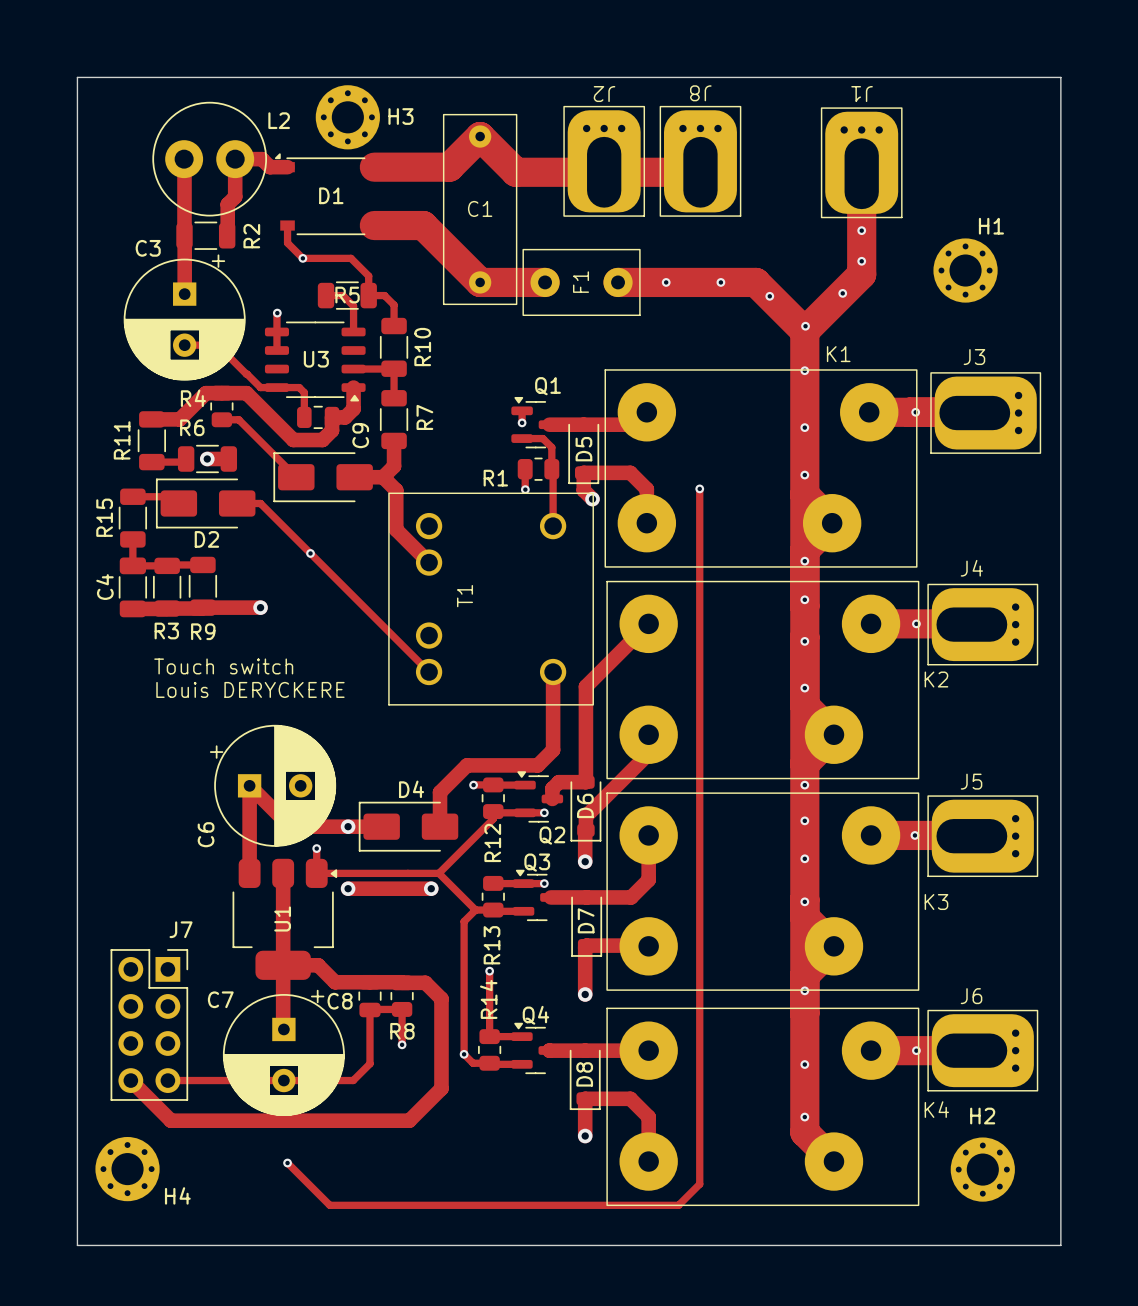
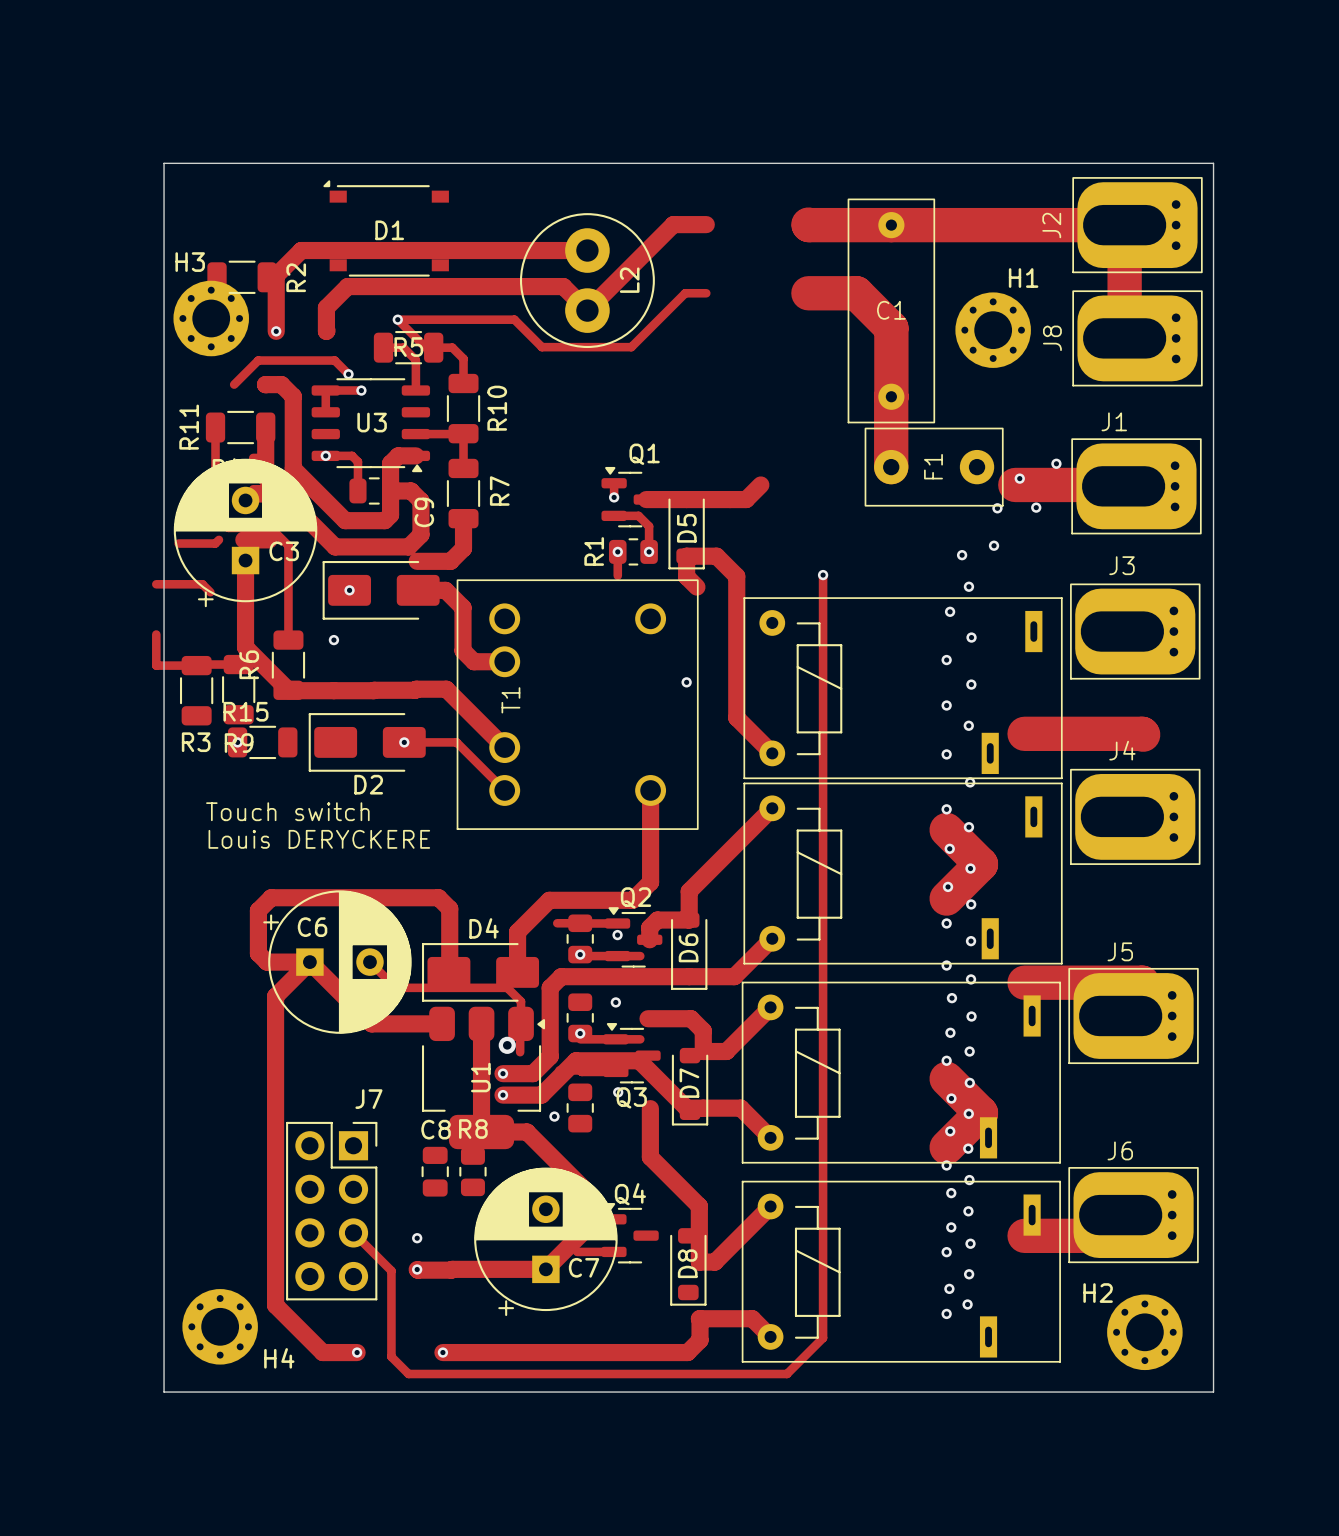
board edge: (77, 77) (1060, 77) (1060, 1245) (77, 1245) (77, 77) -> (164, 163) (164, 1392) (1213, 1392) (1213, 163) (164, 163)
J8 name position: J8 (700, 93) -> J8 (1052, 338)
J2 name position: J2 (604, 94) -> J2 (1051, 225)
H3 name position: H3 (400, 116) -> H3 (190, 262)
H3 position: (347, 117) -> (211, 318)
L2 name position: L2 (279, 120) -> L2 (629, 280)
track: (184, 159) (184, 235) -> none
L2 rotation: 0° (209, 159) -> 90° clockwise (587, 280)
L2 position: (209, 159) -> (587, 280)
J2 rotation: 0° (604, 161) -> 90° clockwise (1137, 225)
J2 position: (604, 161) -> (1137, 225)
J8 rotation: 0° (700, 161) -> 90° clockwise (1137, 338)
J8 position: (700, 161) -> (1137, 338)
J1 rotation: 0° (861, 162) -> 90° clockwise (1136, 486)
J1 position: (861, 162) -> (1136, 486)
track: (287, 167) (270, 167) (262, 159) (235, 159) (235, 196) (227, 204) (227, 235) -> none
track: (374, 167) (449, 167) (480, 136) (515, 172) (700, 172) -> none
track: (861, 173) (861, 274) (804, 331) -> none
track: none -> (706, 224) (673, 224) (587, 310) (563, 286) (347, 286) (326, 307) (327, 330)
track: none -> (808, 224) (1124, 225) (1124, 338)
C1 position: (480, 209) -> (891, 310)
track: none -> (587, 250) (301, 250) (276, 275) (276, 331)
track: (287, 225) (287, 243) (302, 258) (351, 258) (368, 276) (368, 295) -> (706, 293) (685, 293) (631, 347) (541, 347) (514, 319) (397, 319) (425, 347) (433, 347)
track: (374, 225) (423, 225) (480, 282) (545, 282) -> none
via: (861, 230) -> none
track: (184, 235) (184, 294) -> none
C3 name position: C3 (148, 248) -> C3 (284, 551)
track: none -> (808, 293) (856, 293) (891, 328) (891, 396)
via: (302, 258) -> none
via: (861, 261) -> none
H1 position: (965, 270) -> (993, 330)
via: none -> (397, 319)
via: none -> (276, 331)
F1 position: (581, 282) -> (934, 467)
track: (618, 282) (755, 282) (804, 331) -> none
via: (666, 282) -> none
via: (720, 282) -> none
via: (842, 293) -> none
via: (769, 296) -> none
track: (277, 313) (276, 331) -> (361, 390) (325, 390)
via: (277, 313) -> none
C3 rotation: 0° (184, 317) -> 180° (245, 532)
C3 position: (184, 317) -> (245, 532)
track: none -> (348, 374) (334, 360) (258, 360) (234, 384)
via: none -> (348, 374)
via: (805, 326) -> none
track: (804, 331) (804, 1132) (833, 1161) -> none
via: none -> (361, 390)
track: none -> (891, 396) (891, 467)
track: (184, 345) (217, 345) (260, 387) (276, 387) -> none
track: none -> (215, 427) (215, 515) (228, 527) (270, 527) (288, 545) (288, 640)
track: none -> (265, 427) (265, 477) (335, 546) (408, 546) (420, 534) (420, 500) (411, 490) (406, 490)
via: (804, 370) -> none
via: none -> (325, 455)
track: (353, 387) (353, 409) (345, 417) -> (415, 455) (398, 455) (390, 463) (390, 490)
via: none -> (1056, 463)
via: none -> (1019, 478)
via: (915, 412) -> none
J3 position: (985, 413) -> (1135, 631)
track: (151, 419) (179, 419) (206, 393) (246, 393) (293, 440) (322, 440) (332, 430) -> (265, 384) (281, 384) (293, 396) (293, 468) (345, 520) (384, 520) (390, 515) (390, 506)
track: (221, 419) (238, 419) (296, 477) -> none
R6 name position: R6 (192, 427) -> R6 (249, 664)
via: (804, 427) -> none
via: none -> (1036, 507)
via: none -> (997, 508)
R11 rotation: 0° (151, 440) -> 90° clockwise (240, 427)
R11 position: (151, 440) -> (240, 427)
R6 rotation: 0° (207, 458) -> 90° clockwise (288, 665)
R6 position: (207, 458) -> (288, 665)
via: (207, 458) -> none
via: none -> (994, 545)
K1: (761, 468) -> none
via: none -> (617, 551)
via: none -> (649, 551)
track: (553, 470) (553, 526) -> none
track: (609, 472) (630, 472) (646, 489) (646, 523) -> (716, 556) (736, 576) (736, 717) (772, 753)
via position: (804, 475) -> (962, 555)
track: none -> (245, 560) (245, 647) (288, 690) (446, 689) (504, 747)
part position: (323, 477) -> (381, 590)
track: (383, 477) (396, 490) (396, 529) (429, 562) -> (418, 590) (445, 590) (463, 607) (463, 650) (473, 661) (504, 661)
R1 name rotation: 0° (495, 478) -> 90° counterclockwise (594, 551)
via: (525, 489) -> none
via: none -> (968, 586)
via: (592, 499) -> none
via: none -> (349, 590)
D2 position: (205, 503) -> (367, 742)
track: (237, 503) (260, 503) (388, 631) -> (404, 742) (456, 742)
R15 rotation: 0° (132, 518) -> 90° clockwise (262, 742)
R15 position: (132, 518) -> (262, 742)
via: none -> (950, 611)
via: none -> (971, 637)
via: none -> (333, 640)
via: (310, 553) -> none
via: none -> (686, 682)
via: none -> (971, 684)
part: none -> (903, 688)
C4: (132, 587) -> none
T1 name position: T1 (465, 596) -> T1 (510, 700)
track: (260, 607) (132, 608) -> none
via: (260, 607) -> none
via: none -> (968, 725)
track: (648, 623) (585, 686) (585, 757) -> (772, 808) (689, 891)
via: (916, 623) -> none
J4 position: (982, 624) -> (1135, 816)
via: none -> (237, 742)
via: none -> (404, 742)
via: none -> (970, 782)
text position: Touch switch (223, 666) -> Touch switch (287, 811)
K2: (762, 680) -> none
text position: Louis DERYCKERE (250, 689) -> Louis DERYCKERE (319, 839)
via: none -> (968, 827)
via: none -> (949, 848)
track: (648, 734) (648, 753) (585, 816) (585, 861) -> none
via: none -> (970, 868)
part: none -> (903, 873)
via: none -> (948, 886)
via: none -> (971, 904)
C6 position: (273, 785) -> (337, 962)
via: (473, 785) -> none
via: none -> (617, 935)
track: none -> (772, 938) (734, 976) (561, 976) (550, 987) (550, 1056) (533, 1073) (502, 1073)
via: none -> (971, 941)
track: (493, 811) (493, 819) (438, 873) -> none
via: none -> (580, 954)
via: (544, 812) -> none
track: none -> (449, 957) (449, 908) (438, 897) (271, 897) (258, 910) (258, 953) (267, 962) (309, 962)
track: none -> (309, 962) (371, 1023) (442, 1023)
track: none -> (309, 962) (275, 996) (275, 1305) (322, 1352) (357, 1352)
track: none -> (369, 962) (395, 987) (507, 987) (521, 1001) (520, 1052)
via: (348, 826) -> none
track: (381, 826) (290, 826) (249, 785) (249, 873) -> none
via: none -> (971, 979)
C6 name rotation: 0° (206, 834) -> 90° clockwise (312, 927)
C6 name position: C6 (206, 834) -> C6 (312, 927)
Q2 name position: Q2 (552, 835) -> Q2 (636, 897)
track: (648, 835) (648, 879) (631, 897) (550, 897) -> none
via: (914, 835) -> none
J5 position: (982, 836) -> (1133, 1015)
R12 name: R12 (492, 842) -> none
track: (316, 848) (316, 873) (438, 873) -> none
via: (316, 848) -> none
via: none -> (951, 998)
via: none -> (615, 1002)
track: none -> (770, 1007) (726, 1051) (703, 1051) (703, 1030) (691, 1018) (648, 1018)
via: (804, 858) -> none
via: (585, 861) -> none
Q3 name position: Q3 (537, 862) -> Q3 (631, 1097)
via: none -> (971, 1016)
part: none -> (580, 1017)
track: none -> (481, 1023) (481, 1132) (527, 1132) (584, 1189) (584, 1230) (545, 1269) (417, 1269)
track: (283, 873) (283, 1029) -> none
track: (438, 873) (475, 910) (464, 921) (464, 1054) (473, 1063) (489, 1063) -> none
via: none -> (580, 1033)
via: none -> (950, 1032)
via: (544, 883) -> none
track: (348, 888) (431, 888) -> none
via: (348, 888) -> none
K3: (762, 891) -> none
via: none -> (969, 1051)
R13: (493, 896) -> none
part: none -> (901, 1072)
via: none -> (502, 1073)
U1 position: (284, 919) -> (483, 1077)
via: none -> (969, 1082)
via: none -> (618, 1092)
track: none -> (502, 1095) (541, 1095) (575, 1060) (639, 1060) (686, 1108) (740, 1108) (770, 1137)
via: none -> (502, 1095)
via: none -> (951, 1098)
part: none -> (580, 1107)
track: none -> (650, 1108) (650, 1157) (699, 1206) (699, 1262) (714, 1262) (770, 1206)
track: (648, 946) (586, 945) (585, 994) -> none
via: none -> (968, 1113)
via: none -> (554, 1116)
via: none -> (950, 1131)
track: (283, 965) (318, 965) (335, 982) (425, 982) (441, 998) (441, 1088) (409, 1120) (170, 1120) (130, 1080) -> none
track: (489, 971) (489, 1036) (521, 1036) -> none
via: (489, 971) -> none
via: none -> (968, 1148)
via: (585, 994) -> none
C7 name position: C7 (220, 999) -> C7 (584, 1267)
C8 name position: C8 (340, 1001) -> C8 (436, 1129)
via: none -> (969, 1180)
via: none -> (951, 1193)
J7 position: (149, 1024) -> (331, 1211)
via: none -> (968, 1211)
R8 name position: R8 (402, 1031) -> R8 (473, 1129)
via: none -> (951, 1227)
track: (402, 1044) (402, 1009) (370, 1009) (369, 1063) (353, 1080) (167, 1080) -> none
via: (402, 1044) -> none
R14: (489, 1049) -> none
track: (549, 1050) (648, 1050) -> none
via: (916, 1050) -> none
J6 position: (982, 1050) -> (1133, 1215)
C7 rotation: 0° (283, 1052) -> 180° (545, 1241)
C7 position: (283, 1052) -> (545, 1241)
via: none -> (417, 1238)
via: (464, 1054) -> none
via: none -> (970, 1243)
via: none -> (417, 1269)
part: none -> (901, 1271)
via: none -> (969, 1274)
via: none -> (949, 1288)
K4: (762, 1106) -> none
via: none -> (967, 1304)
H2 name position: H2 (982, 1116) -> H2 (1098, 1293)
track: none -> (699, 1318) (752, 1318) (770, 1336)
track: none -> (700, 1318) (700, 1340) (687, 1352) (442, 1352)
track: (585, 1136) (585, 1098) (630, 1098) (648, 1117) (648, 1161) -> none
via: (585, 1136) -> none
track: (699, 1137) (699, 1184) (678, 1205) (329, 1205) (287, 1163) -> (823, 1337) (787, 1374) (408, 1374) (391, 1356) (391, 1270) (353, 1232)
via: none -> (442, 1352)
via position: (287, 1163) -> (357, 1352)
H4 position: (127, 1169) -> (220, 1326)
H2 position: (982, 1169) -> (1144, 1332)

